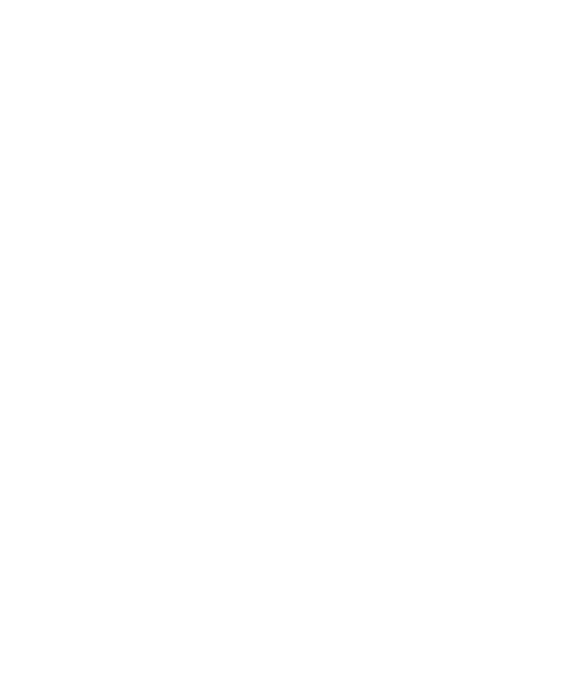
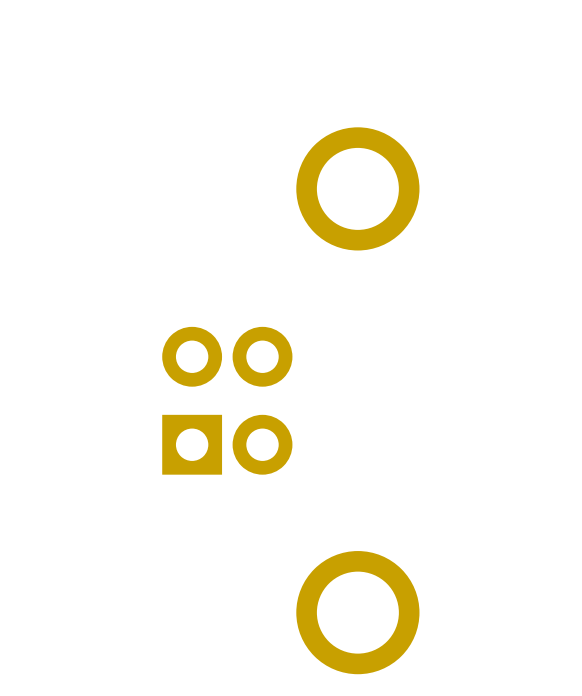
part: none -> (290, 400)

